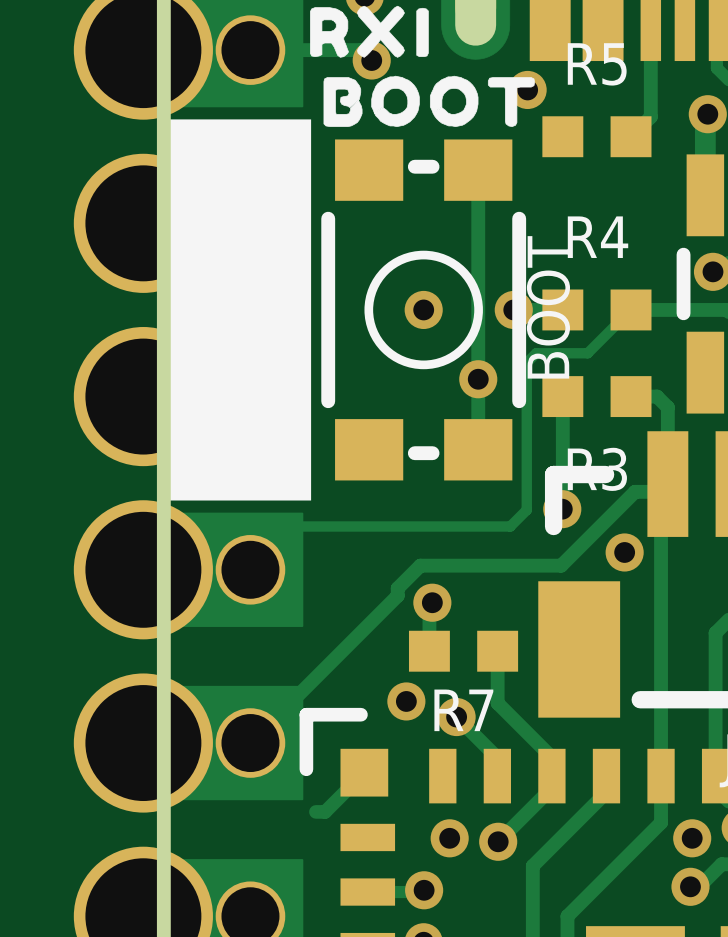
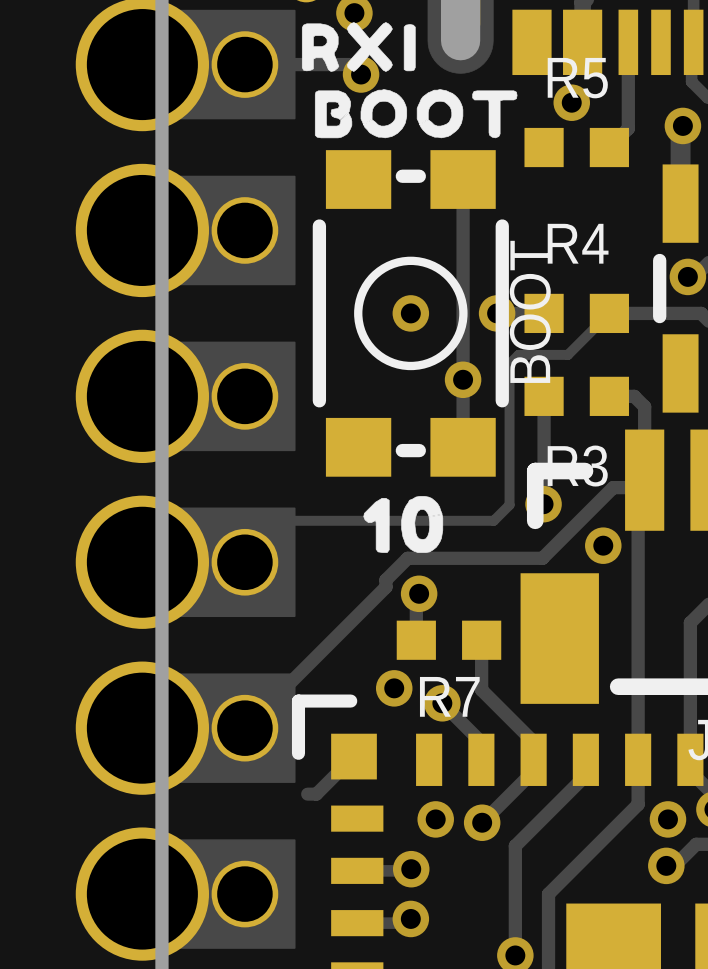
via position: (527, 89) -> (571, 102)
drawing: [163, 119, 312, 501] -> none
drawing: none -> [363, 496, 444, 553]

